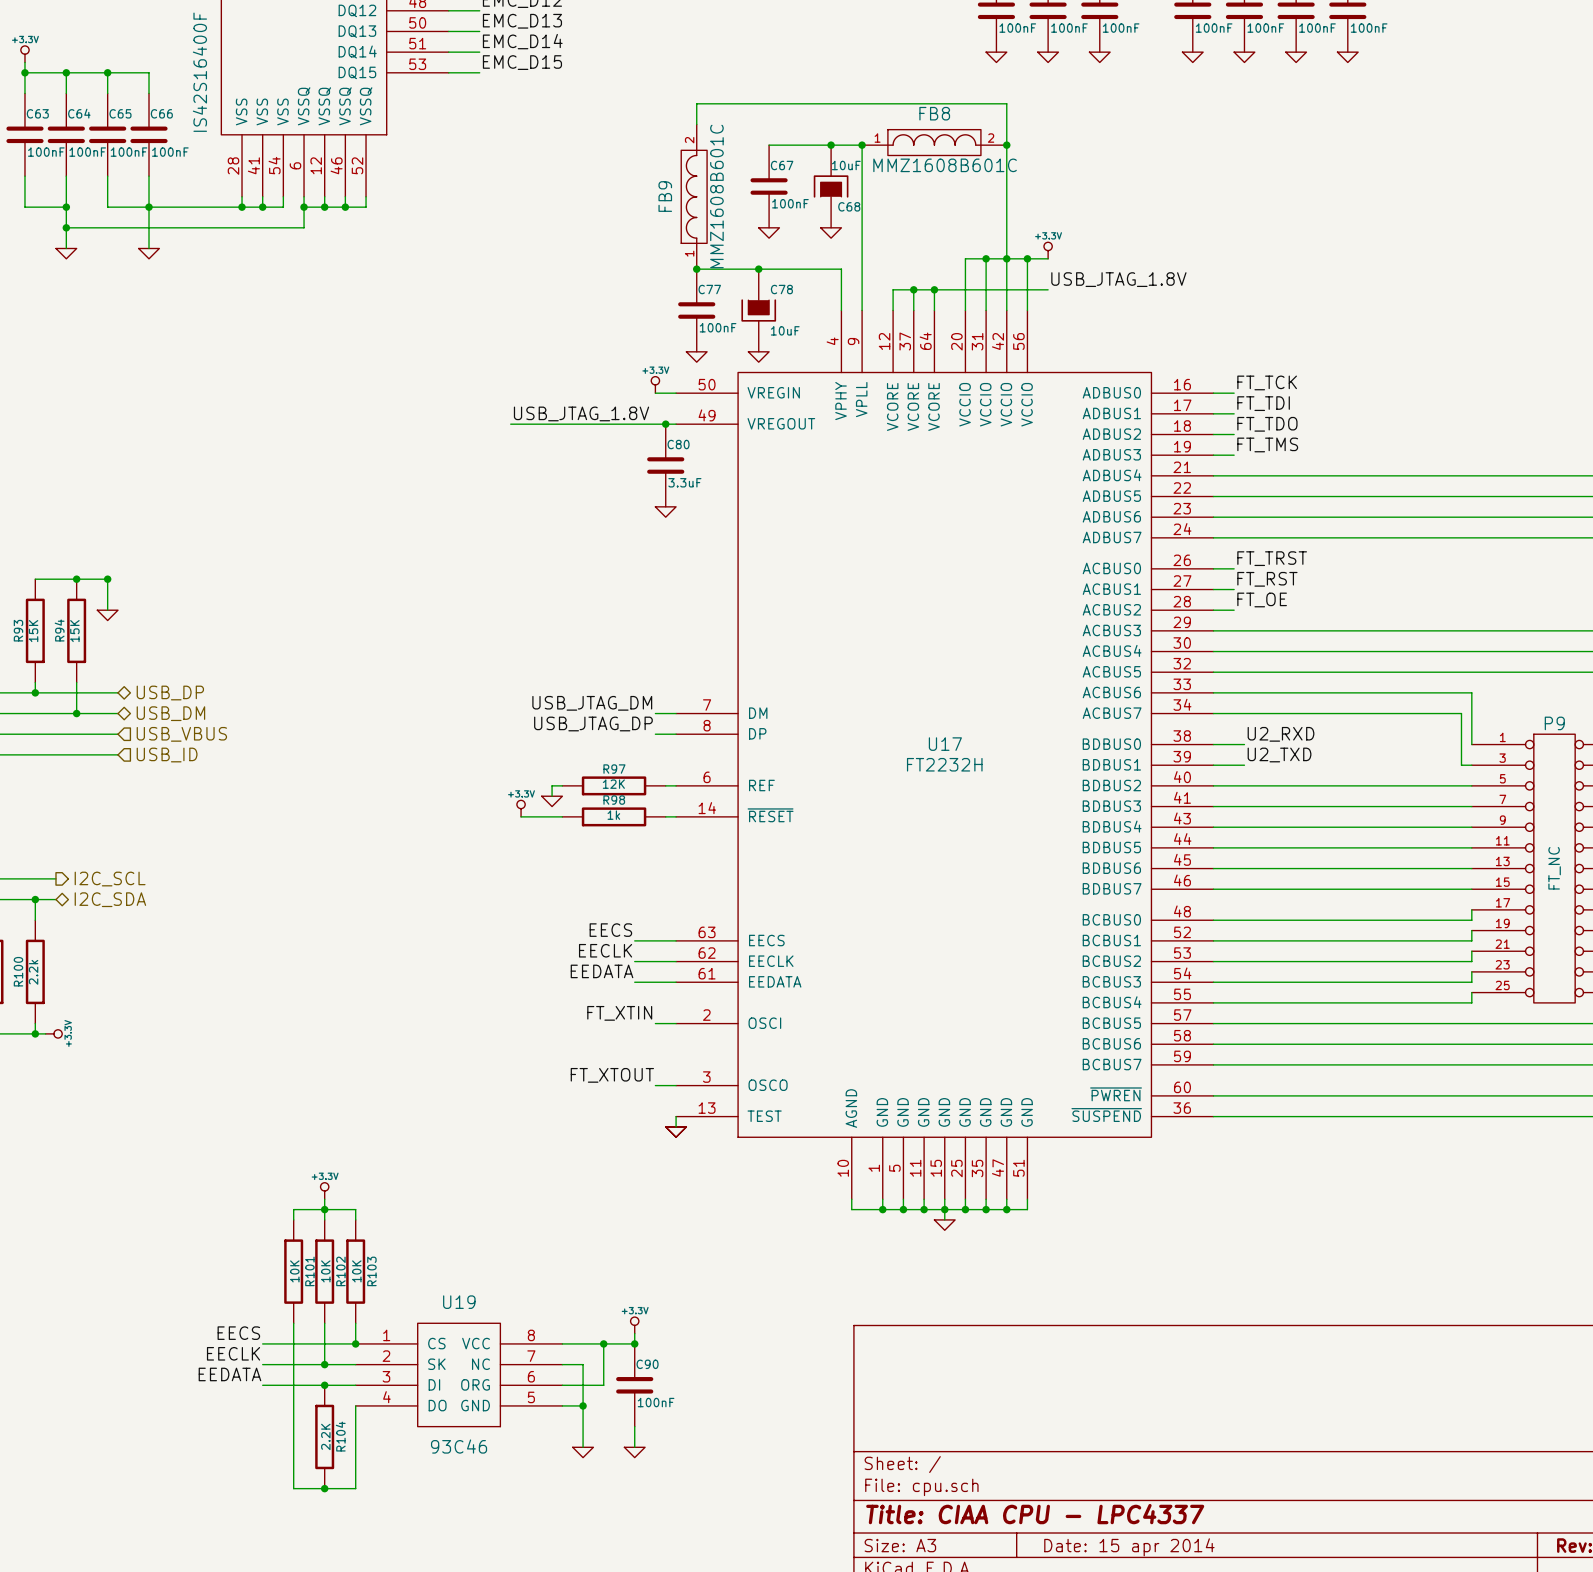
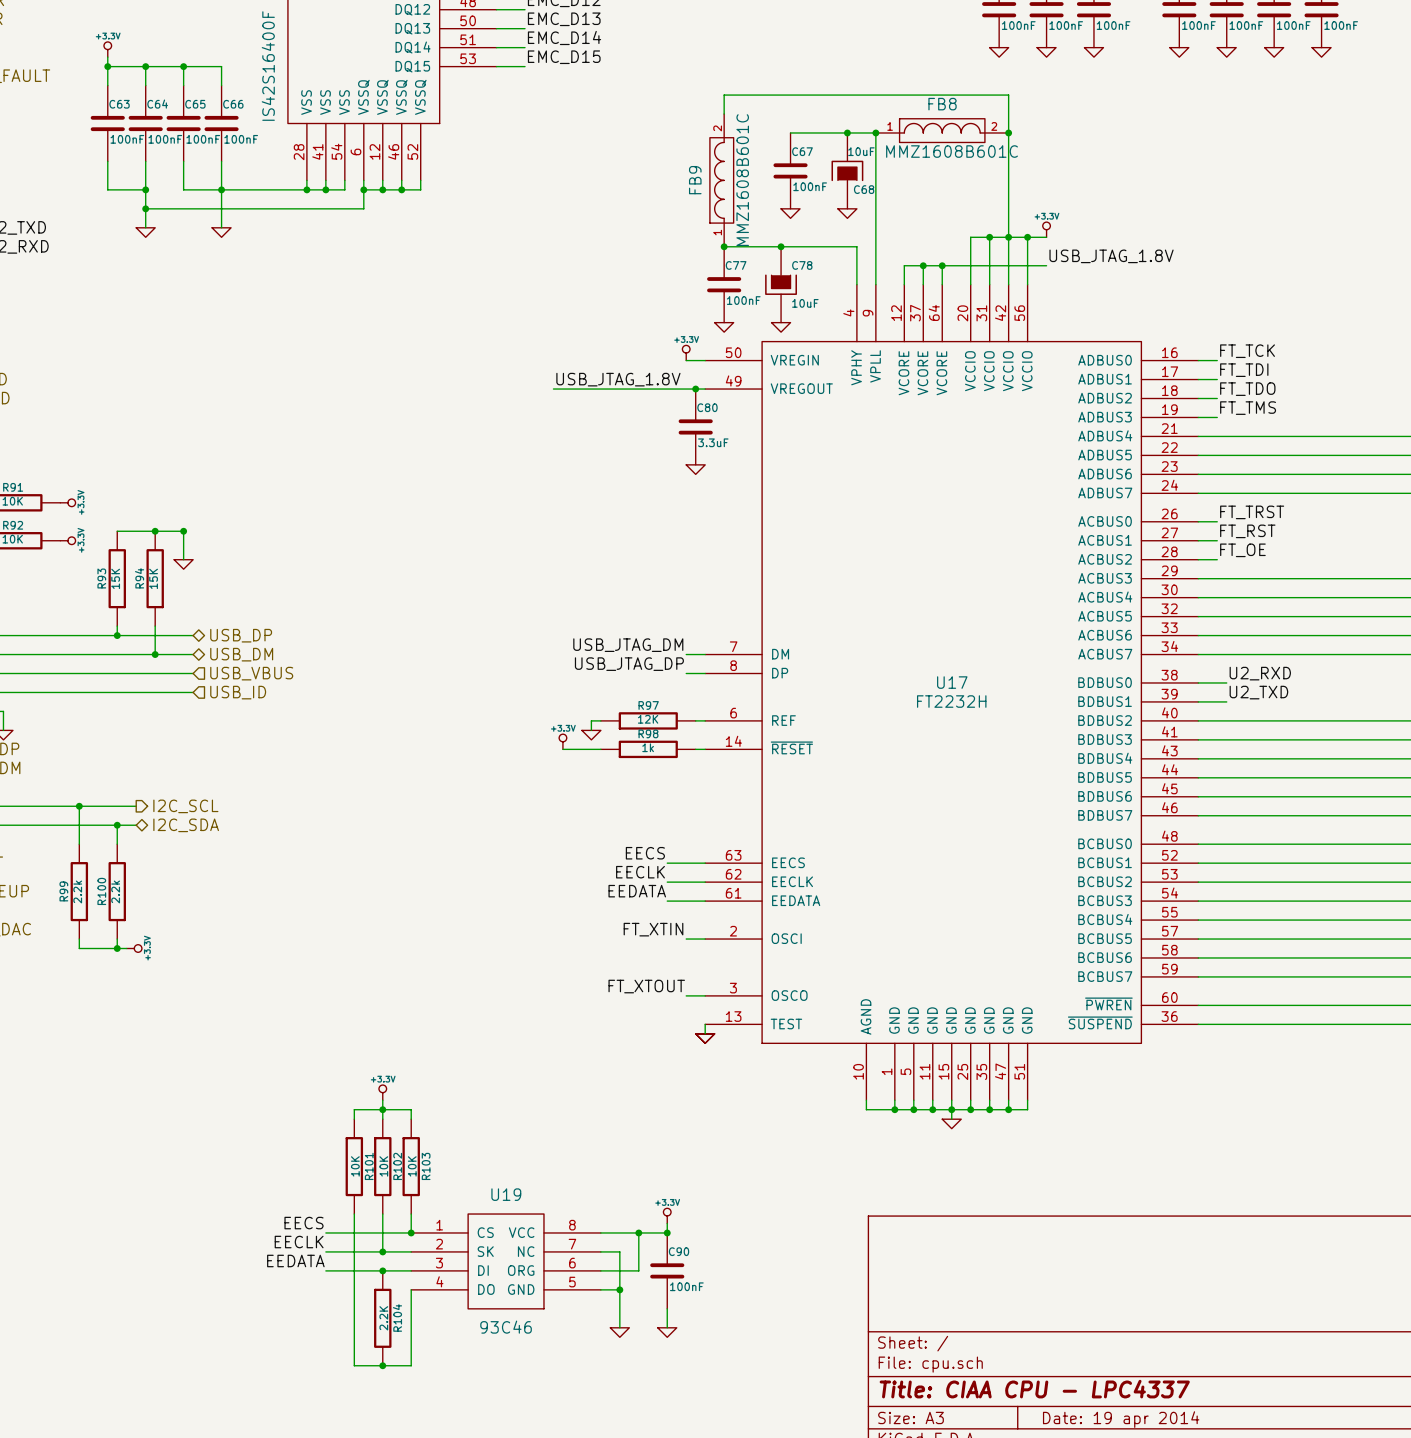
title block: Date: 15 apr 2014 (1129, 1547) -> Date: 19 apr 2014 (1121, 1419)

